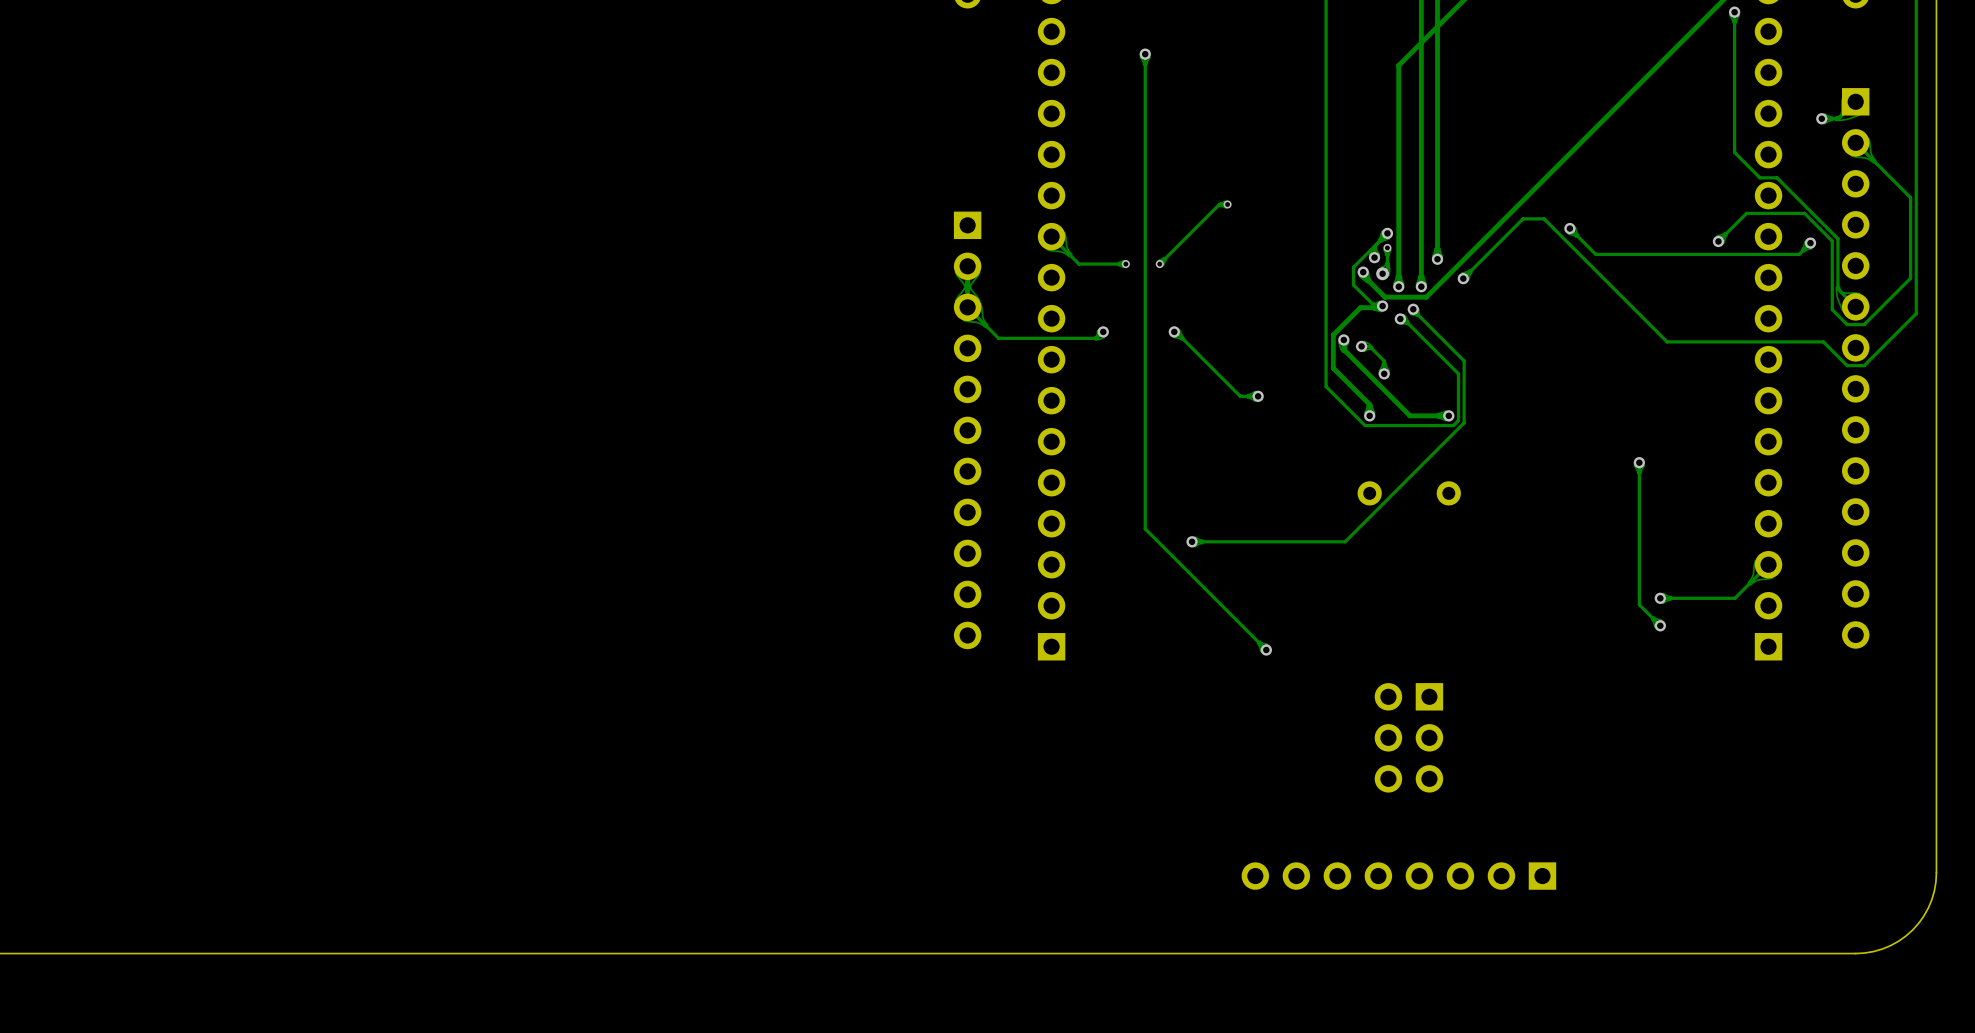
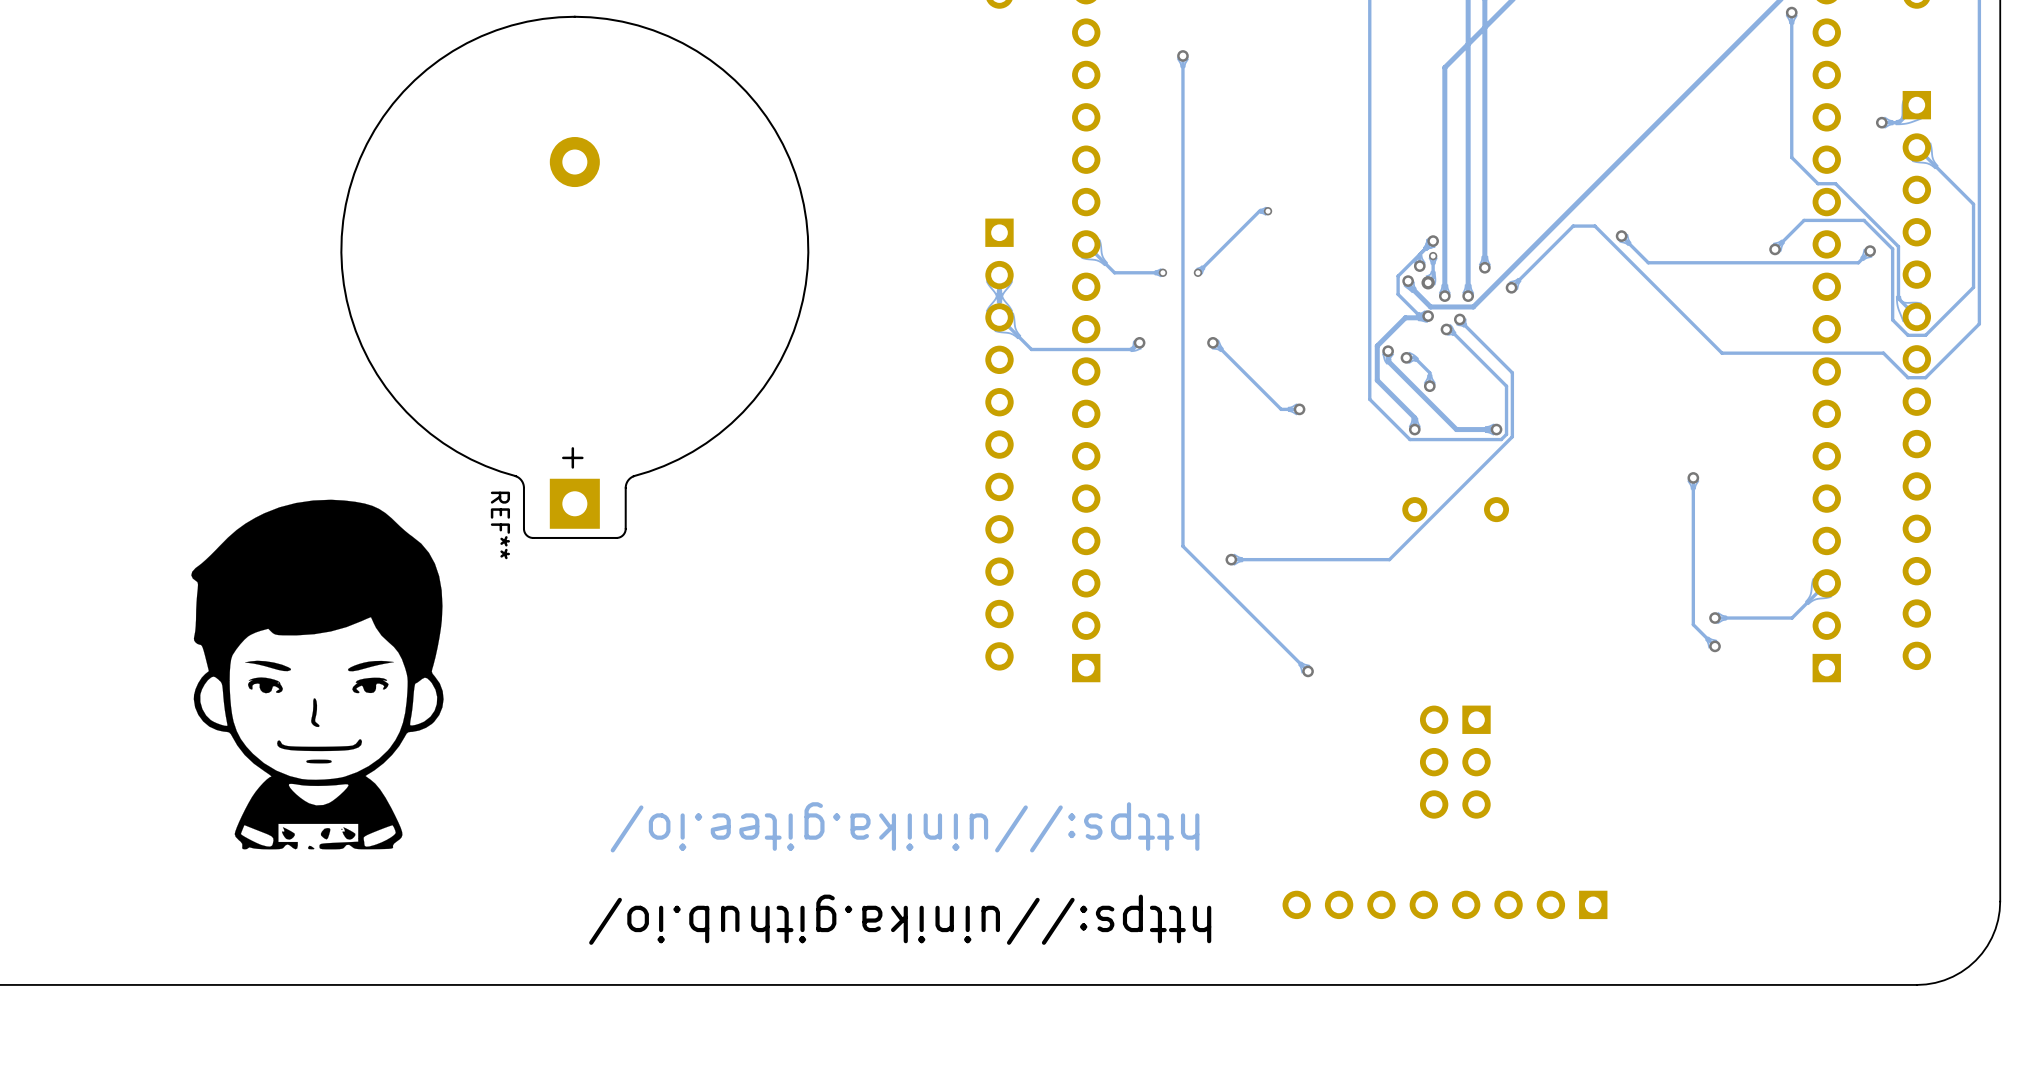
REF**: none -> (574, 277)
drawing: none -> [191, 499, 444, 850]
text: none -> https://uinika.gitee.io/ (905, 827)
text: none -> https://uinika.github.io/ (900, 919)

